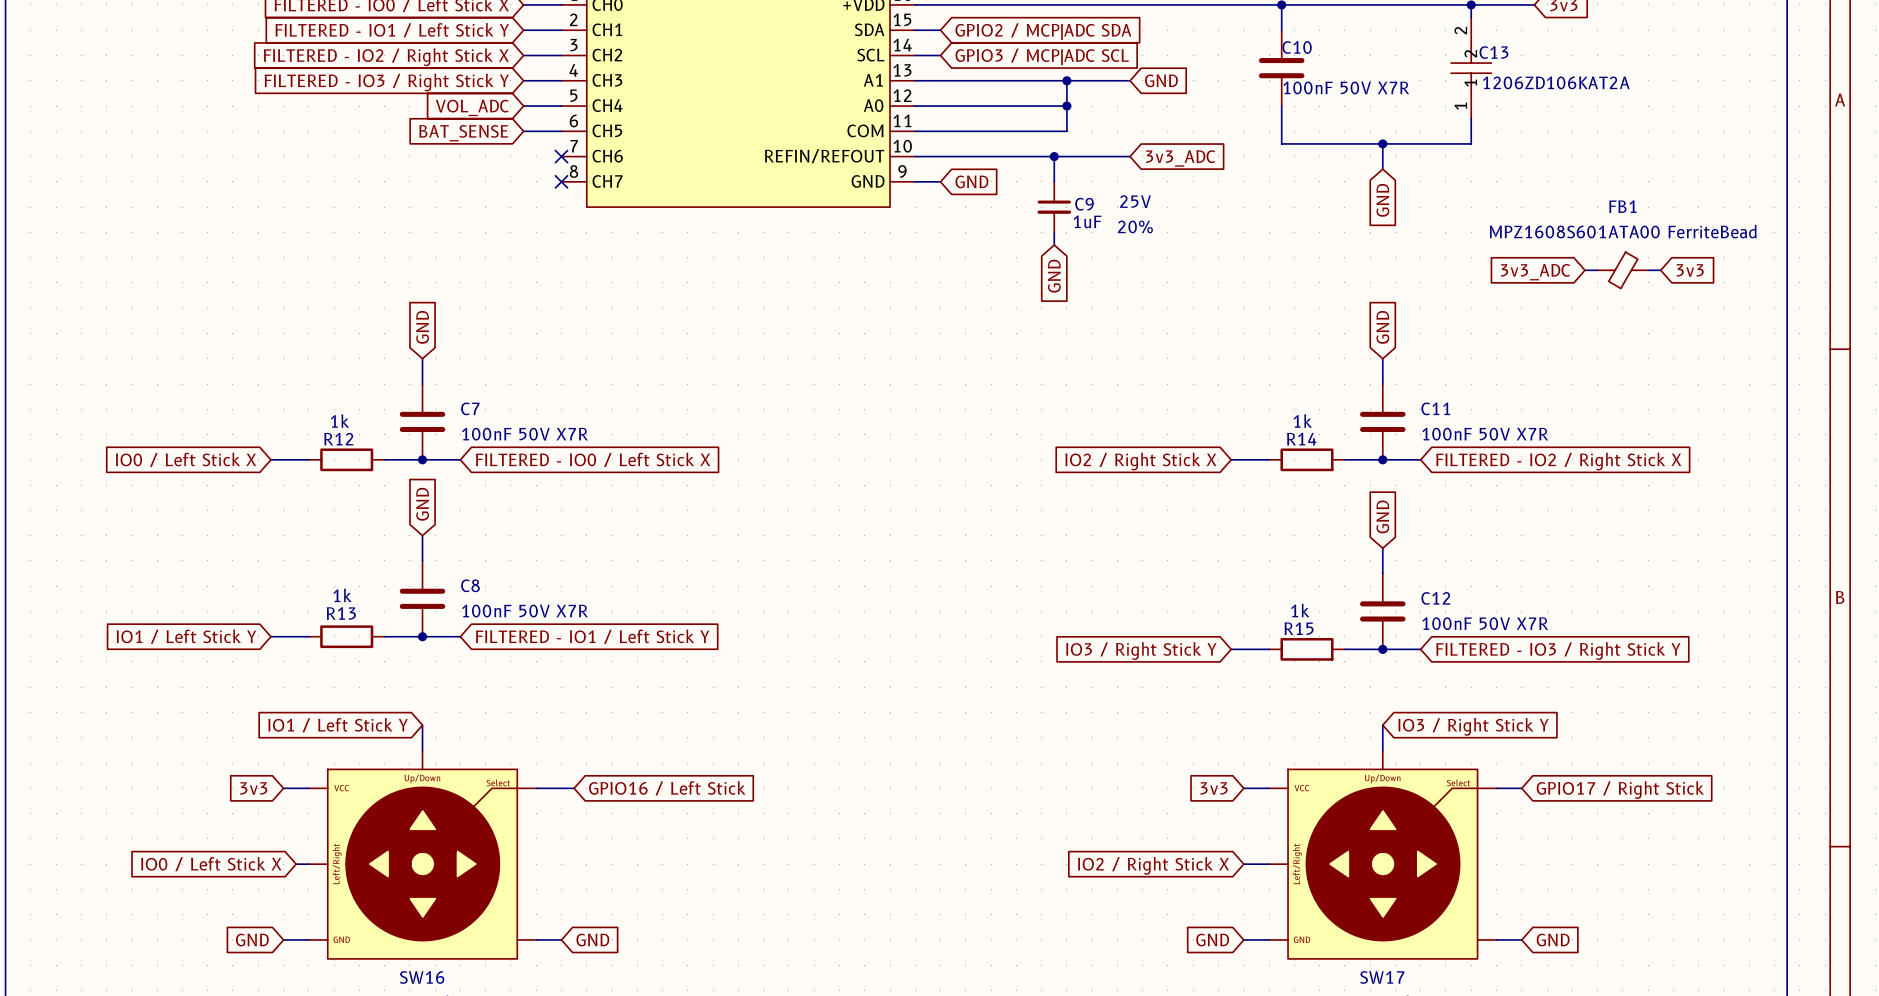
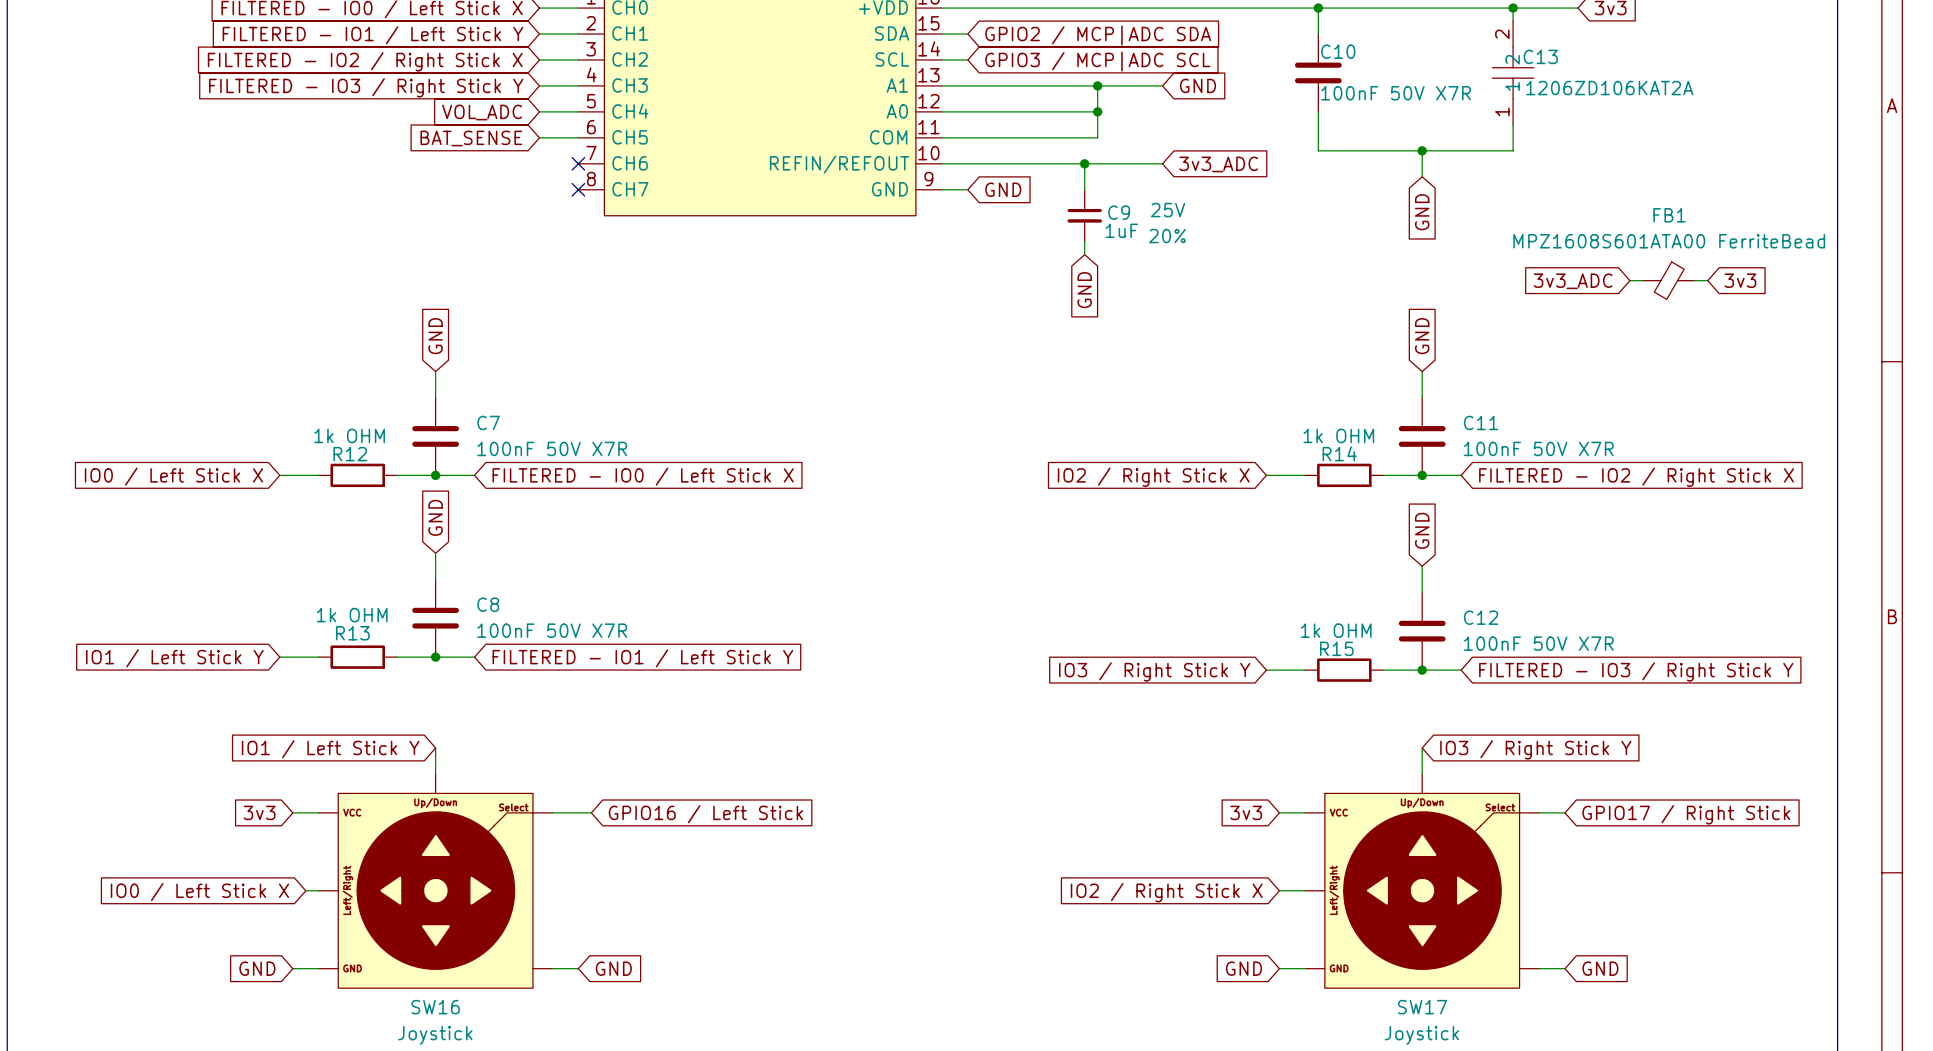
R12 value: 1k (339, 421) -> 1k OHM (349, 435)
R14 value: 1k (1302, 421) -> 1k OHM (1338, 435)
R13 value: 1k (342, 595) -> 1k OHM (352, 615)
R15 value: 1k (1300, 610) -> 1k OHM (1336, 630)

